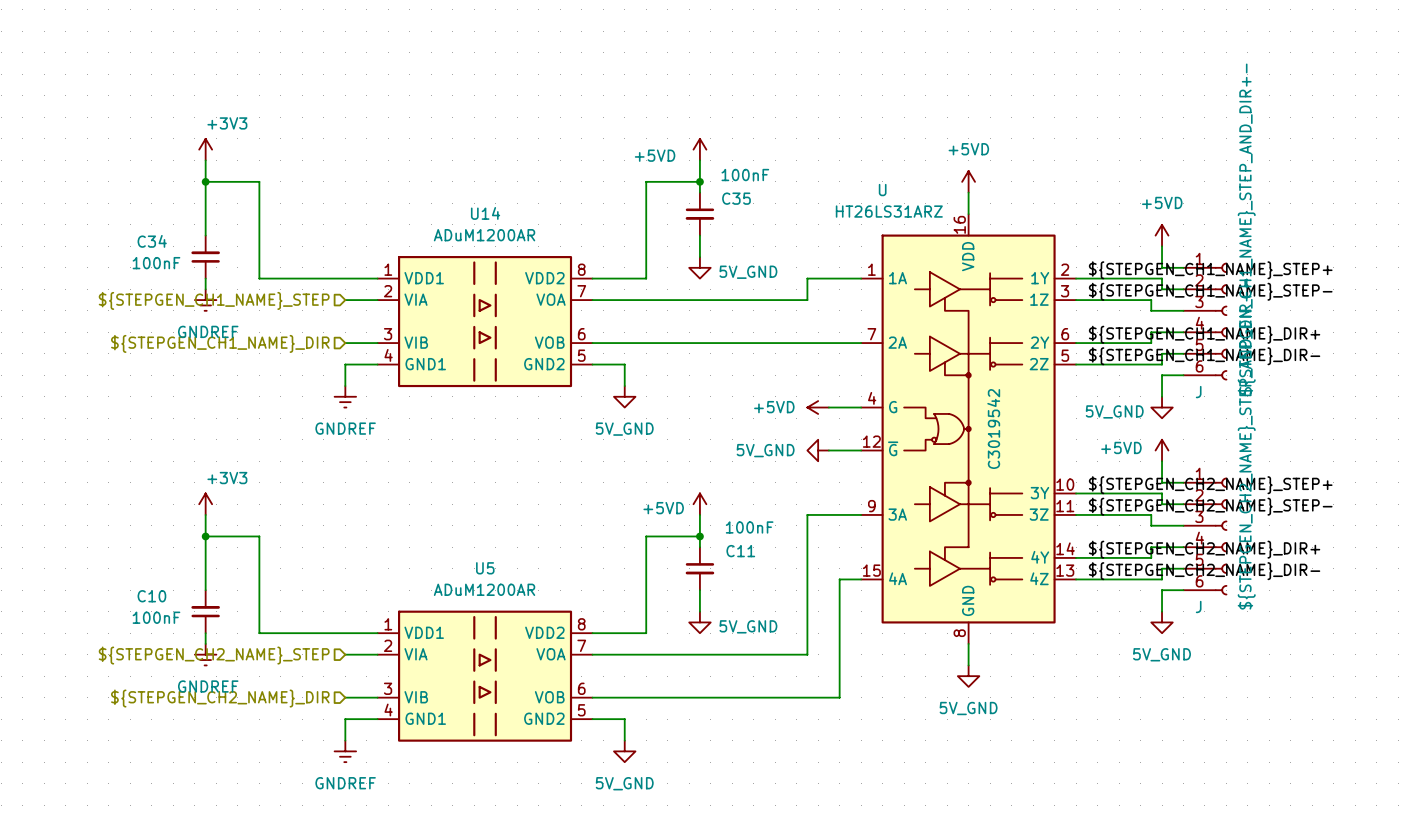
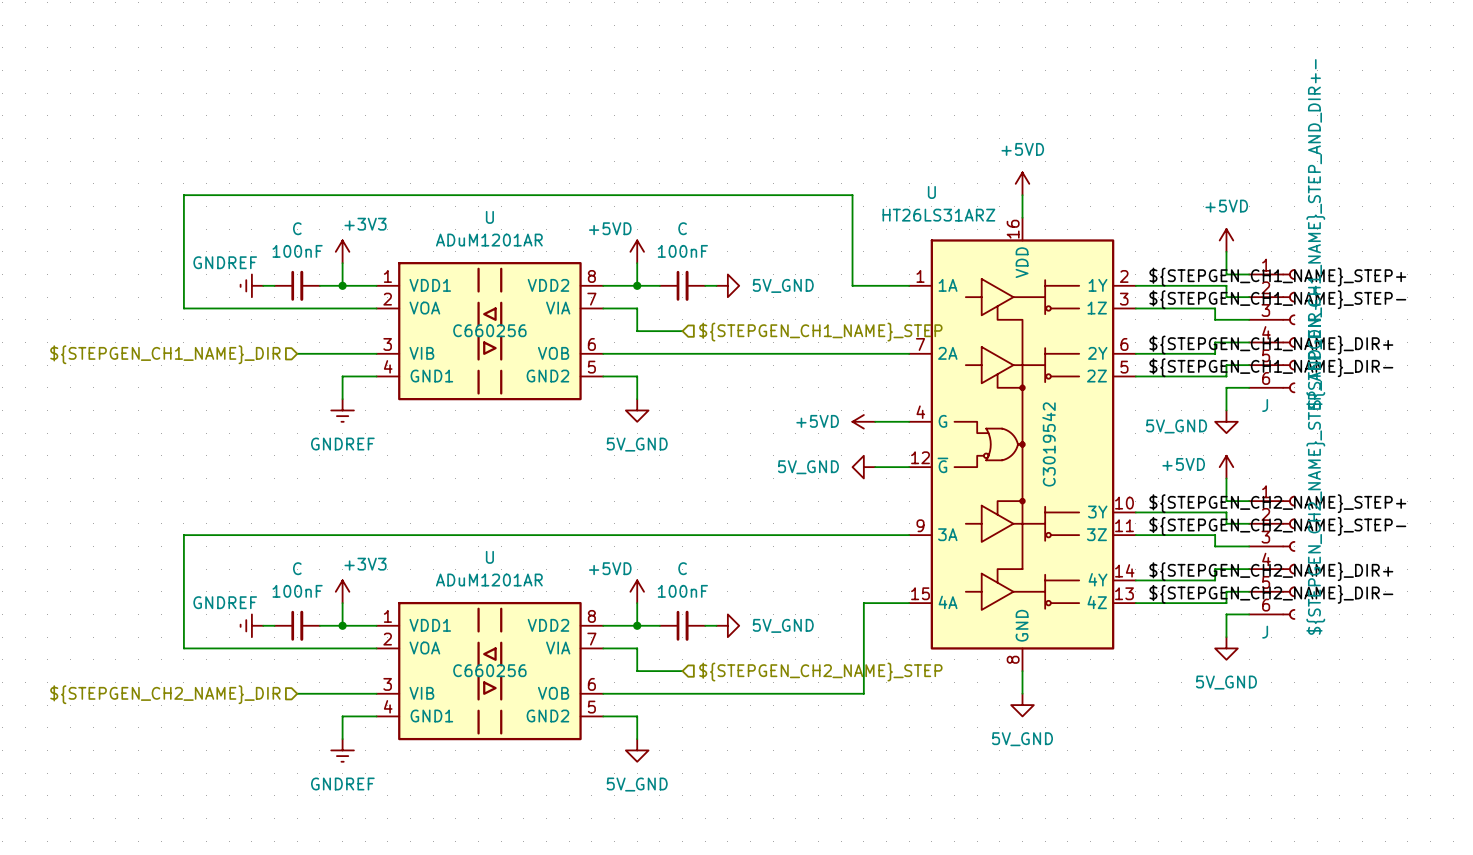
power symbol: +3V3 (205, 149) -> none
power symbol position: +5VD (699, 149) -> +5VD (637, 251)
power symbol text position: +5VD (655, 155) -> +5VD (610, 228)
wire: (205, 160) (205, 235) -> none
wire: (699, 160) (699, 192) -> none
wire: (205, 181) (259, 181) (259, 278) (302, 278) -> none
junction: (205, 181) -> none
wire: (699, 181) (646, 181) (646, 278) (624, 278) -> none
junction: (699, 181) -> none
C35: 100nF (699, 214) -> none
wire: (699, 235) (699, 257) -> (637, 263) (637, 285)
power symbol: none -> +3V3 (342, 251)
C34: 100nF (205, 257) -> none
wire: none -> (342, 263) (342, 285)
power symbol rotation: 0° (699, 267) -> 90° counterclockwise (727, 285)
power symbol position: 5V_GND (699, 267) -> 5V_GND (727, 285)
wire: (205, 278) (205, 289) -> none
wire: none -> (263, 285) (274, 285)
C: none -> 100nF (297, 285)
junction: none -> (342, 285)
junction: none -> (637, 285)
C: none -> 100nF (682, 285)
wire: none -> (705, 285) (716, 285)
wire: (807, 278) (807, 300) (603, 300) -> (682, 331) (637, 331) (637, 308)
wire: none -> (852, 285) (852, 195) (183, 195) (183, 308) (365, 308)
power symbol rotation: 0° (205, 300) -> 90° clockwise (251, 285)
power symbol position: GNDREF (205, 300) -> GNDREF (251, 285)
hierarchical label: ${STEPGEN_CH1_NAME}_STEP (214, 300) -> none
U: none -> ADuM1201AR (489, 331)
U14: ADuM1200AR (485, 321) -> none
hierarchical label: none -> ${STEPGEN_CH1_NAME}_STEP (820, 332)
power symbol text position: GNDREF (208, 331) -> GNDREF (225, 262)
hierarchical label position: ${STEPGEN_CH1_NAME}_DIR (220, 343) -> ${STEPGEN_CH1_NAME}_DIR (165, 354)
wire: none -> (297, 353) (365, 353)
wire: (345, 364) (345, 386) -> (365, 376) (342, 376) (342, 399)
wire: (603, 364) (624, 364) (624, 386) -> (637, 376) (637, 399)
power symbol position: GNDREF (345, 396) -> GNDREF (342, 410)
power symbol position: 5V_GND (624, 396) -> 5V_GND (637, 410)
power symbol position: +3V3 (205, 504) -> +3V3 (342, 591)
power symbol position: +5VD (699, 504) -> +5VD (637, 591)
power symbol text position: +5VD (663, 508) -> +5VD (610, 568)
wire: (205, 514) (205, 590) -> none
wire: (699, 514) (699, 547) -> none
wire: (807, 514) (807, 654) (592, 654) -> (852, 535) (183, 535) (183, 648) (376, 648)
wire: (205, 536) (259, 536) (259, 633) (377, 633) -> none
junction: (205, 536) -> none
wire: (699, 536) (646, 536) (646, 633) (592, 633) -> none
junction: (699, 536) -> none
C11: 100nF (699, 568) -> none
wire: none -> (342, 603) (342, 625)
wire: (839, 579) (839, 697) (592, 697) -> (886, 603) (863, 603) (863, 693) (603, 693)
wire: (699, 590) (699, 611) -> (637, 603) (637, 625)
wire: none -> (263, 625) (274, 625)
C: none -> 100nF (297, 625)
wire: none -> (319, 625) (376, 625)
junction: none -> (342, 625)
wire: none -> (603, 625) (659, 625)
junction: none -> (637, 625)
C: none -> 100nF (682, 625)
wire: none -> (705, 625) (716, 625)
C10: 100nF (205, 611) -> none
wire: none -> (603, 648) (637, 648) (637, 671) (682, 671)
power symbol rotation: 0° (699, 622) -> 90° counterclockwise (727, 625)
power symbol position: 5V_GND (699, 622) -> 5V_GND (727, 625)
wire: (205, 633) (205, 643) -> none
U: none -> ADuM1201AR (489, 671)
hierarchical label: none -> ${STEPGEN_CH2_NAME}_STEP (820, 672)
power symbol rotation: 0° (205, 654) -> 90° clockwise (251, 625)
power symbol position: GNDREF (205, 654) -> GNDREF (251, 625)
wire: (345, 654) (377, 654) -> none
hierarchical label: ${STEPGEN_CH2_NAME}_STEP (214, 655) -> none
wire: none -> (297, 693) (376, 693)
U5: ADuM1200AR (485, 676) -> none
power symbol text position: GNDREF (208, 686) -> GNDREF (225, 602)
wire: (345, 697) (377, 697) -> none
hierarchical label position: ${STEPGEN_CH2_NAME}_DIR (220, 698) -> ${STEPGEN_CH2_NAME}_DIR (165, 694)
wire: (377, 719) (345, 719) (345, 740) -> (376, 716) (342, 716) (342, 739)
wire: (592, 719) (624, 719) (624, 740) -> (603, 716) (637, 716) (637, 739)
power symbol position: GNDREF (345, 751) -> GNDREF (342, 750)
power symbol position: 5V_GND (624, 751) -> 5V_GND (637, 750)

